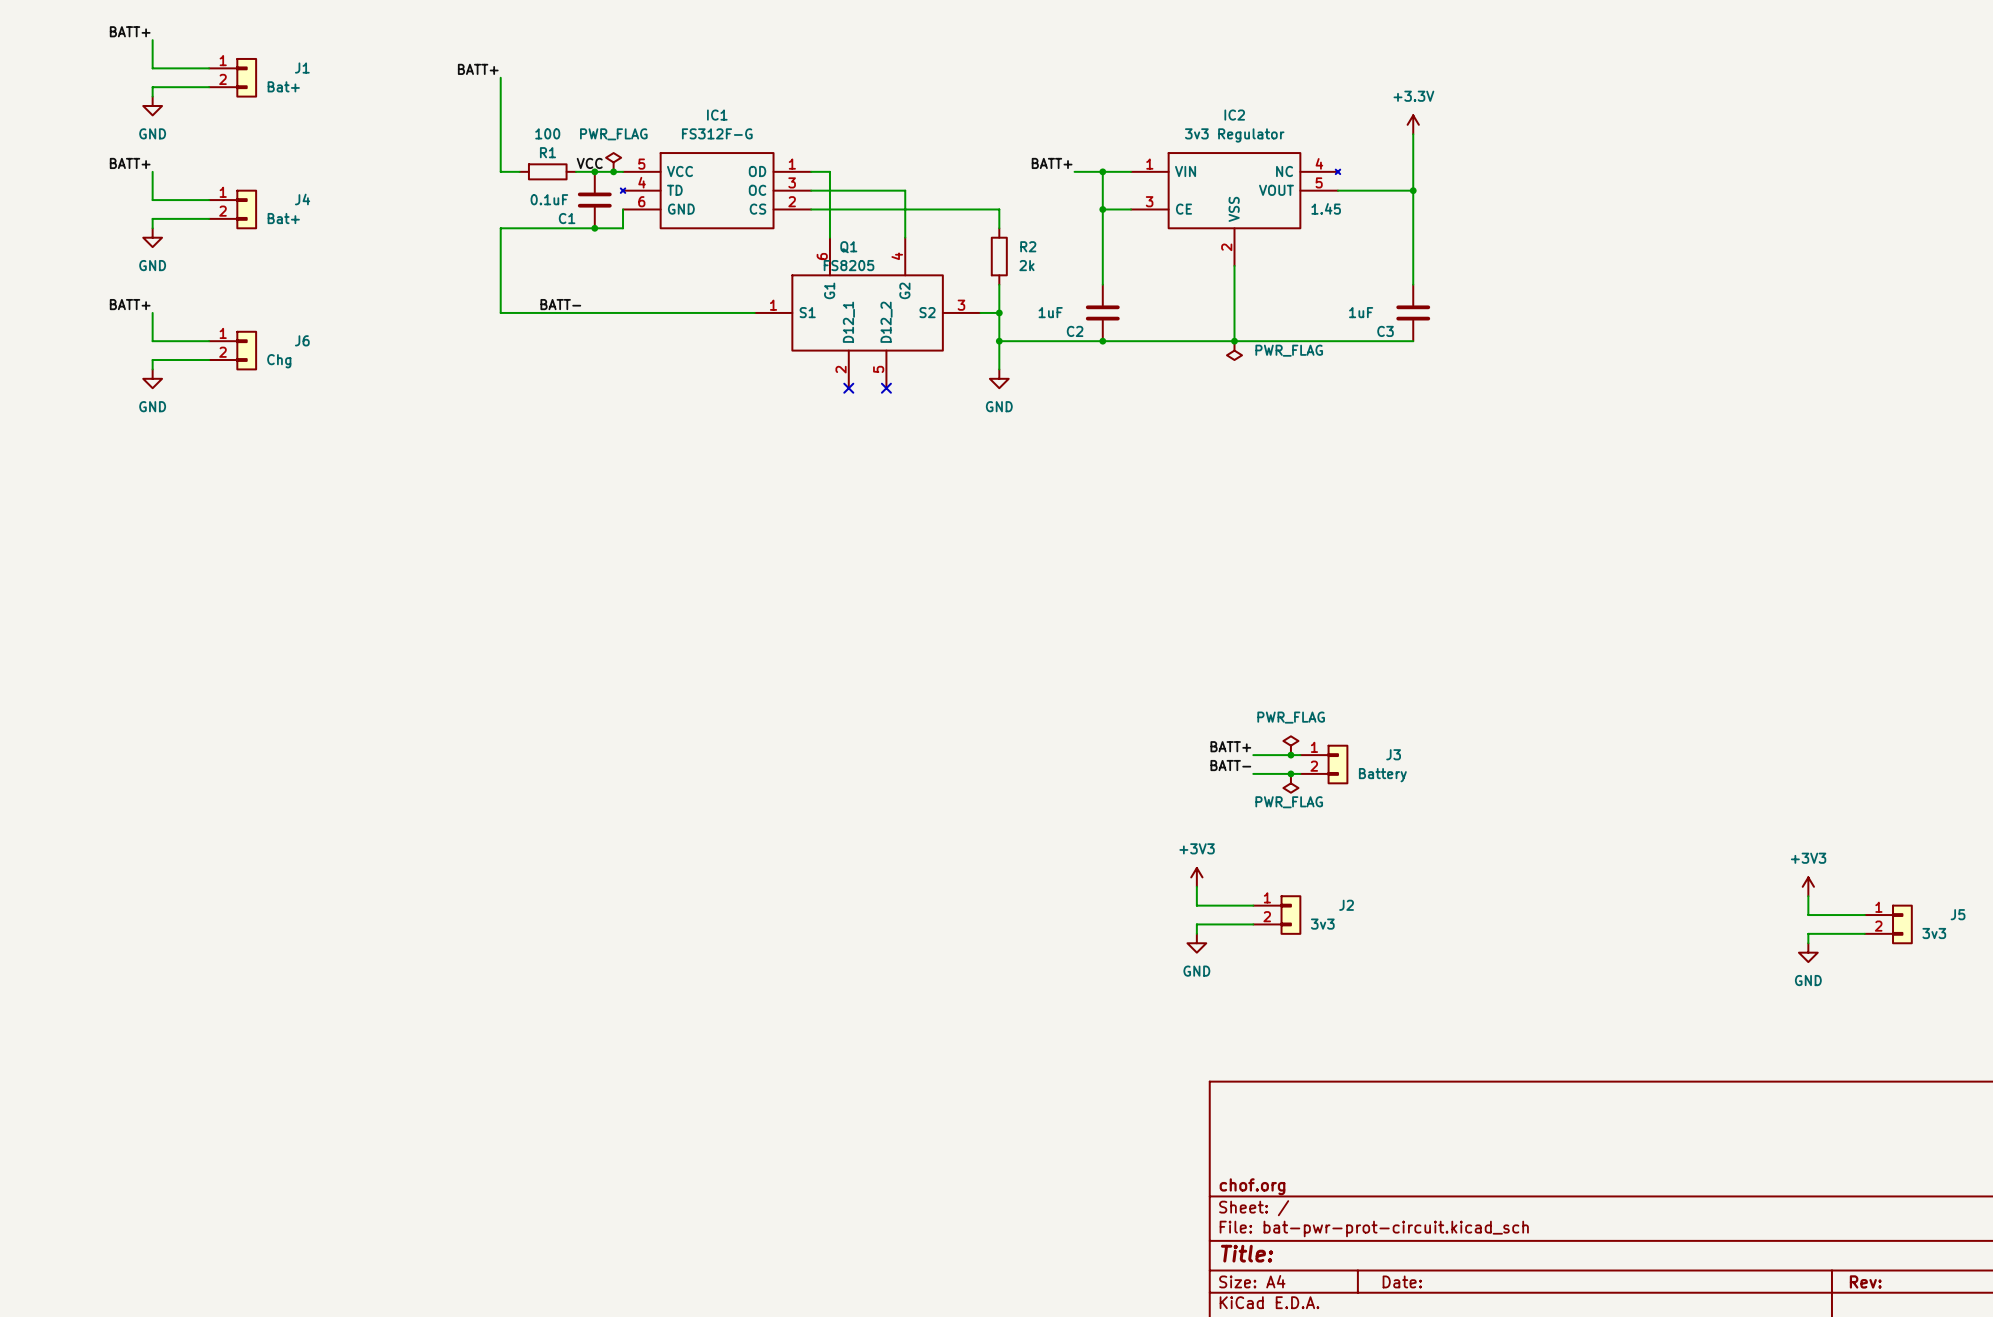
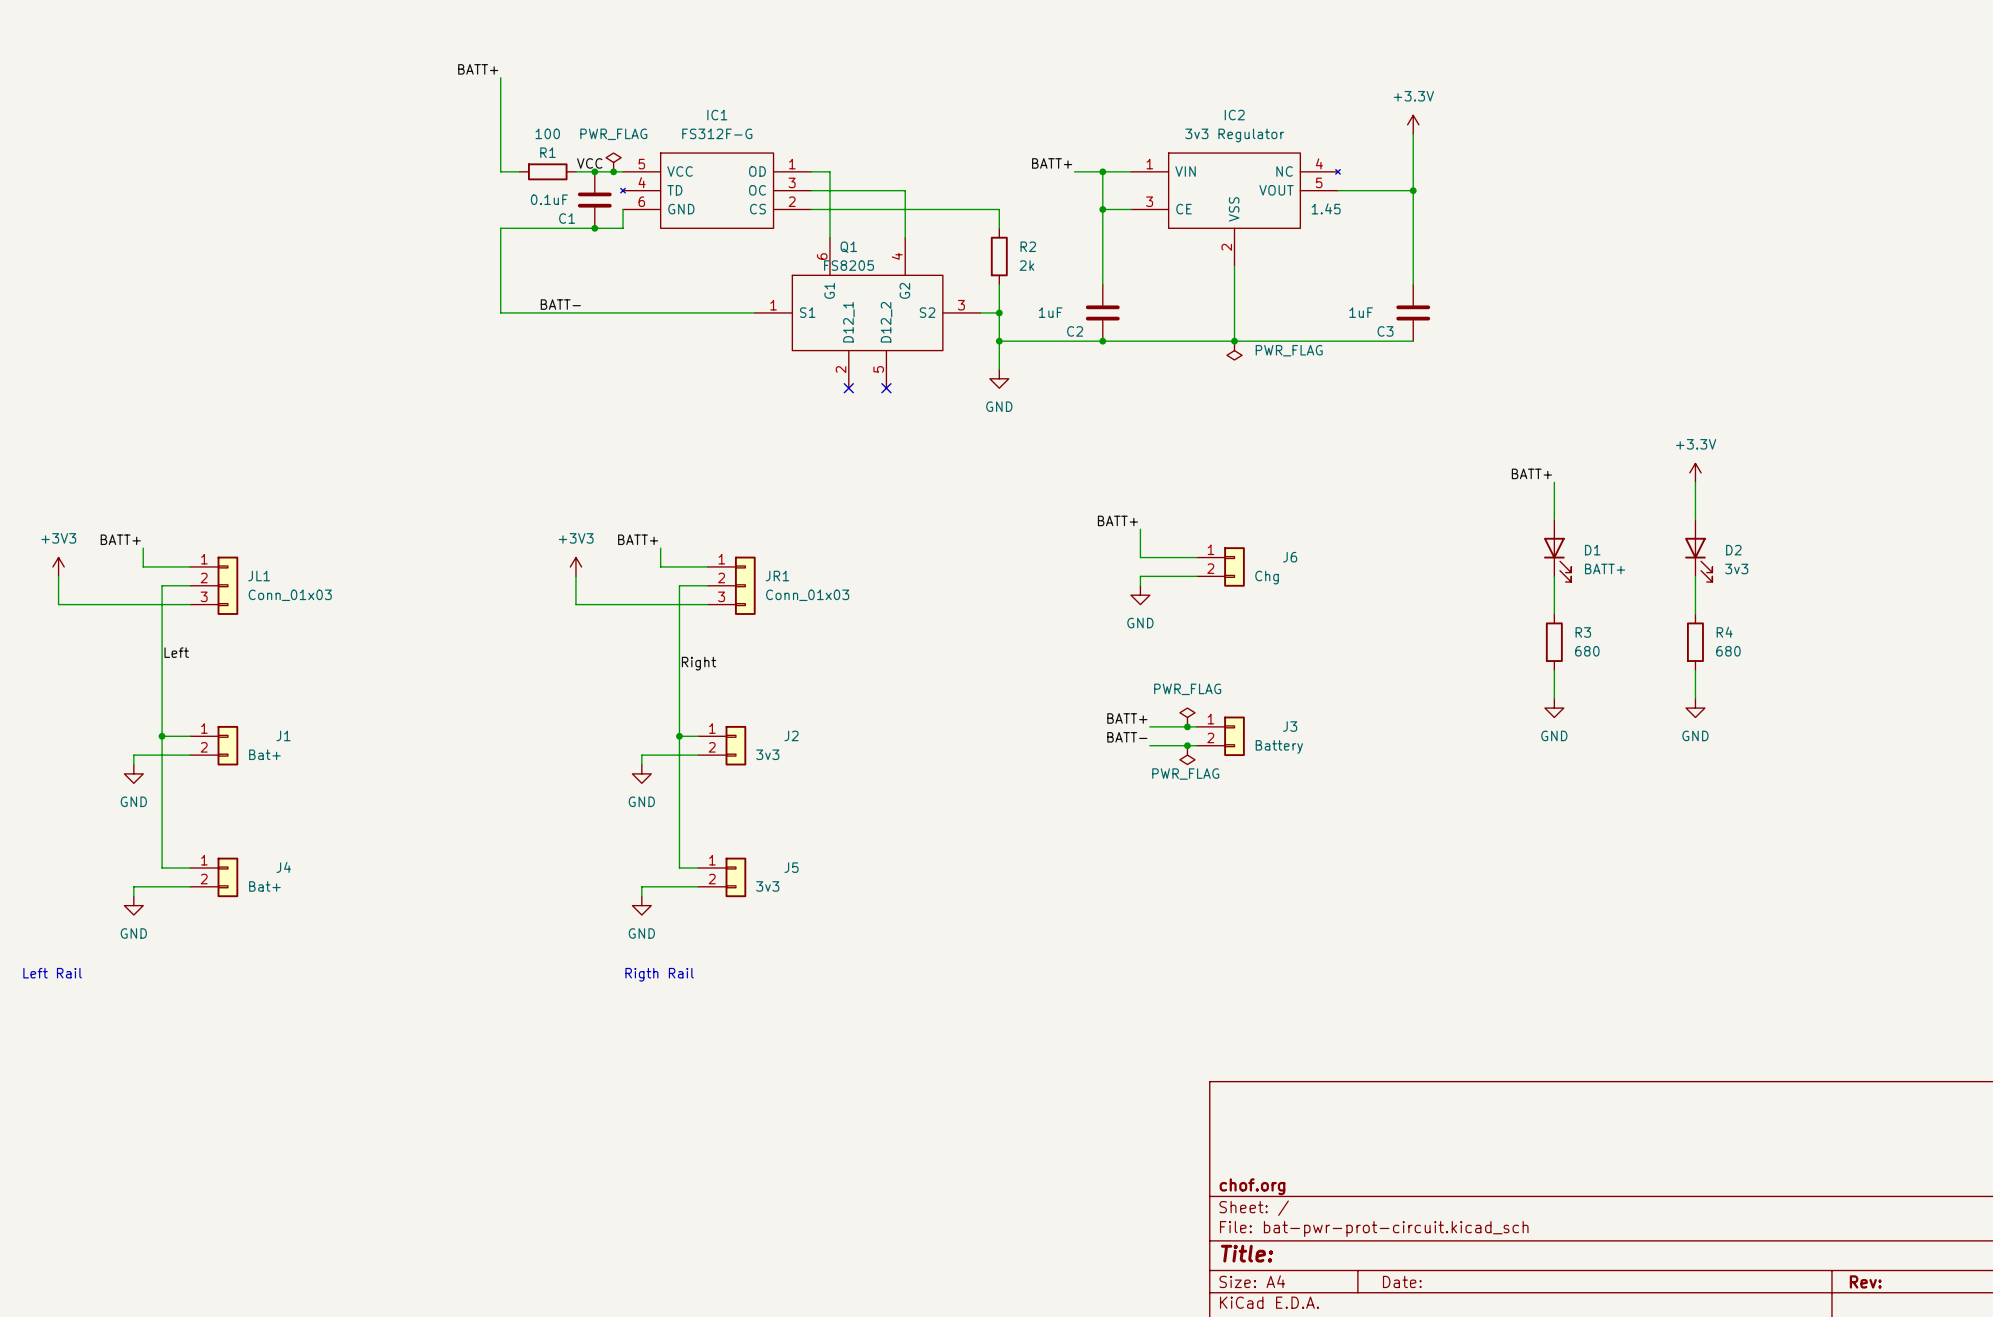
label: BATT+ (130, 31) -> none
wire: (152, 40) (152, 68) (209, 68) -> none
J1 position: (233, 77) -> (214, 745)
wire: (209, 87) (152, 87) (152, 96) -> none
power symbol: GND (152, 106) -> none
label: BATT+ (130, 163) -> none
wire: (152, 171) (152, 200) (209, 200) -> none
J4 position: (233, 209) -> (214, 877)
wire: (209, 218) (152, 218) (152, 228) -> none
power symbol: GND (152, 237) -> none
label: BATT+ (130, 304) -> none
wire: (152, 312) (152, 341) (209, 341) -> none
J6 position: (233, 350) -> (1220, 566)
wire: (209, 360) (152, 360) (152, 369) -> none
power symbol: GND (152, 378) -> none
power symbol: none -> +3.3V (1695, 472)
label: none -> BATT+ (1531, 473)
wire: none -> (1554, 482) (1554, 519)
wire: none -> (1695, 482) (1695, 519)
label: none -> BATT+ (1117, 520)
wire: none -> (1140, 529) (1140, 557) (1196, 557)
label: none -> BATT+ (120, 539)
label: none -> BATT+ (638, 539)
wire: none -> (143, 548) (143, 566) (190, 566)
wire: none -> (660, 548) (660, 566) (707, 566)
D1: none -> BATT+ (1557, 550)
D2: none -> 3v3 (1698, 550)
power symbol: none -> +3V3 (58, 566)
power symbol: none -> +3V3 (575, 566)
wire: none -> (58, 576) (58, 604) (190, 604)
wire: none -> (575, 576) (575, 604) (707, 604)
wire: none -> (1196, 576) (1140, 576) (1140, 585)
wire: none -> (1554, 576) (1554, 614)
wire: none -> (1695, 576) (1695, 614)
wire: none -> (190, 585) (162, 585) (162, 868) (190, 868)
JL1: none -> Conn_01x03 (214, 585)
wire: none -> (707, 585) (679, 585) (679, 868) (698, 868)
JR1: none -> Conn_01x03 (731, 585)
power symbol: none -> GND (1140, 595)
R3: none -> 680 (1554, 642)
R4: none -> 680 (1695, 642)
label: none -> Left (176, 652)
label: none -> Right (699, 663)
wire: none -> (1554, 670) (1554, 698)
wire: none -> (1695, 670) (1695, 698)
power symbol: none -> GND (1554, 708)
power symbol: none -> GND (1695, 708)
power symbol: none -> PWR_FLAG (1187, 717)
junction: none -> (1187, 726)
wire: none -> (162, 736) (190, 736)
junction: none -> (162, 736)
wire: none -> (679, 736) (698, 736)
junction: none -> (679, 736)
junction: none -> (1187, 745)
power symbol: PWR_FLAG (1290, 745) -> none
label position: BATT+ (1230, 746) -> BATT+ (1127, 718)
wire: none -> (190, 755) (133, 755) (133, 764)
wire: none -> (698, 755) (641, 755) (641, 764)
power symbol: none -> PWR_FLAG (1187, 755)
wire: (1253, 755) (1300, 755) -> (1149, 726) (1196, 726)
junction: (1290, 755) -> none
J3 position: (1324, 764) -> (1220, 736)
label position: BATT- (1230, 765) -> BATT- (1127, 737)
power symbol: none -> GND (133, 773)
power symbol: none -> GND (641, 773)
wire: (1253, 773) (1300, 773) -> (1149, 745) (1196, 745)
junction: (1290, 773) -> none
power symbol: PWR_FLAG (1290, 783) -> none
power symbol: +3V3 (1196, 877) -> none
wire: none -> (190, 886) (133, 886) (133, 896)
wire: none -> (698, 886) (641, 886) (641, 896)
wire: (1196, 886) (1196, 905) (1253, 905) -> none
power symbol: +3V3 (1808, 886) -> none
wire: (1808, 896) (1808, 915) (1864, 915) -> none
power symbol: none -> GND (133, 905)
power symbol: none -> GND (641, 905)
J2 position: (1277, 915) -> (722, 745)
wire: (1253, 924) (1196, 924) (1196, 933) -> none
J5 position: (1888, 924) -> (722, 877)
wire: (1864, 933) (1808, 933) (1808, 943) -> none
power symbol: GND (1196, 943) -> none
power symbol: GND (1808, 952) -> none
text: none -> Left Rail (52, 973)
text: none -> Rigth Rail (659, 974)

